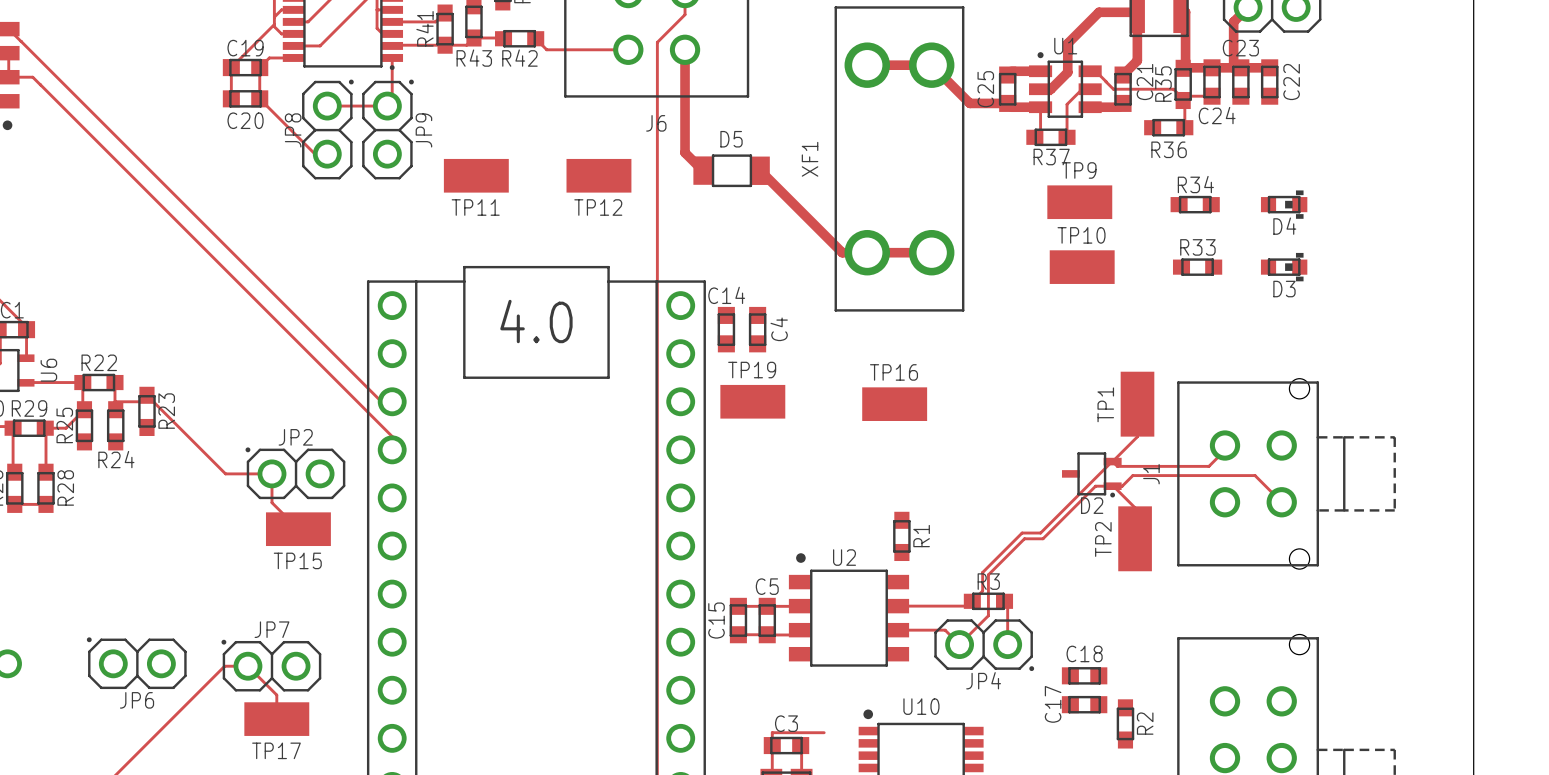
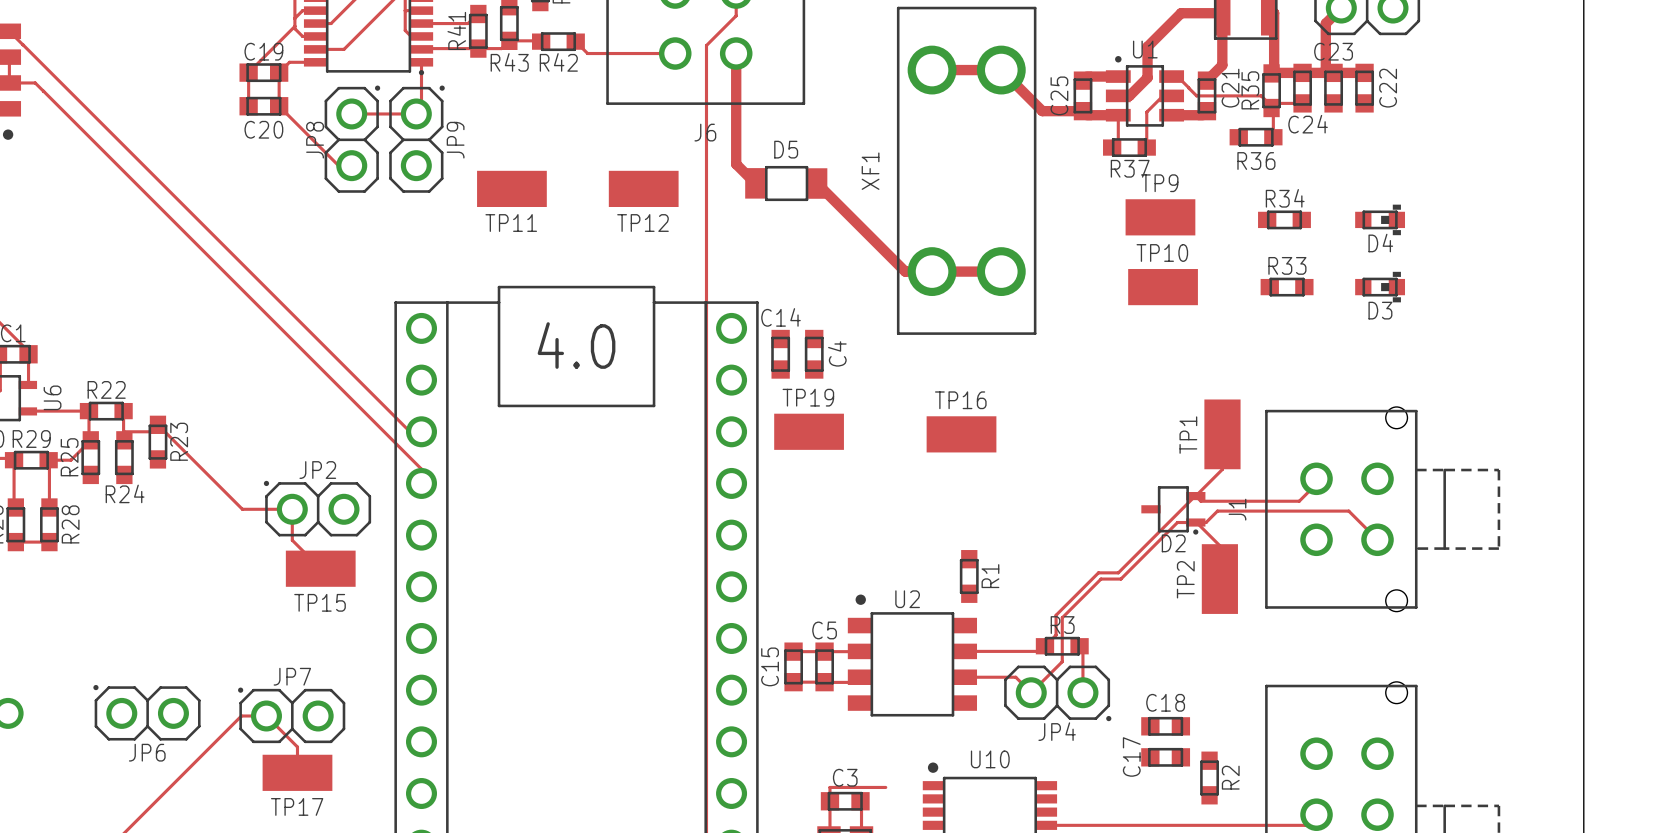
track: none -> (1316, 814) (1305, 825) (1046, 825)

